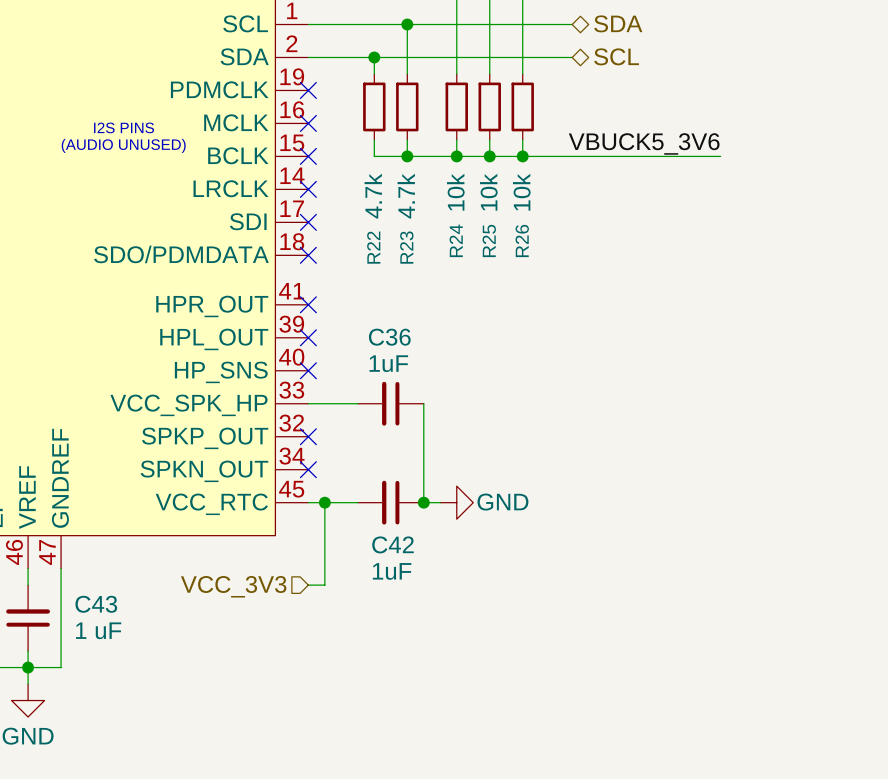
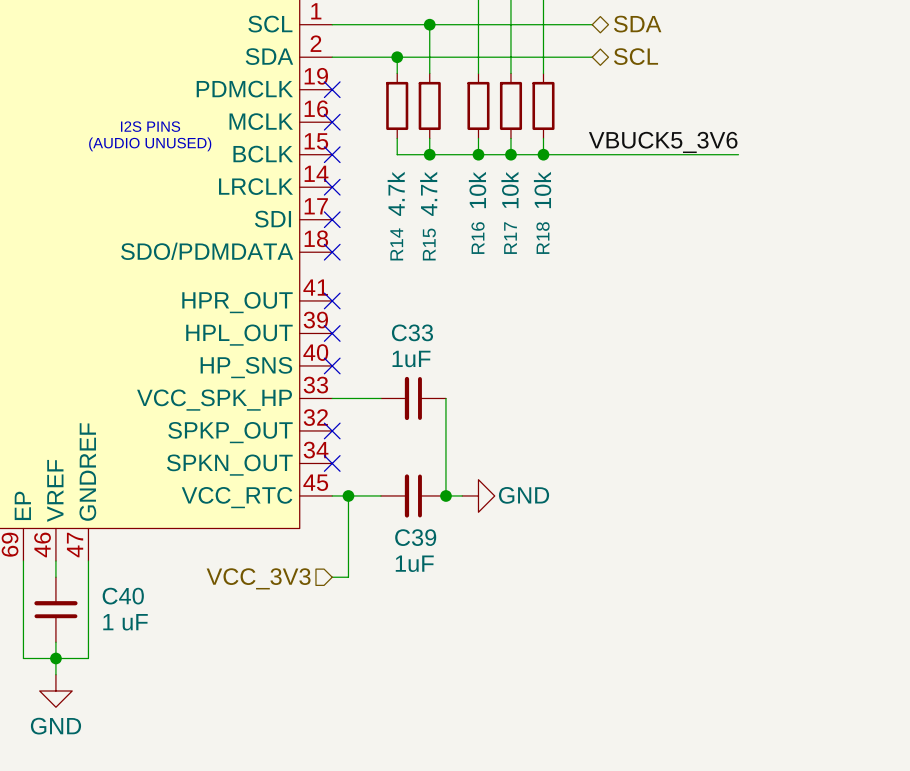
R24 name: R24 (456, 240) -> R16 (478, 238)
R25 name: R25 (489, 240) -> R17 (510, 238)
R26 name: R26 (522, 240) -> R18 (543, 238)
R22 name: R22 (373, 247) -> R14 (396, 244)
R23 name: R23 (406, 247) -> R15 (429, 244)
C36 name: C36 (389, 337) -> C33 (412, 332)
C42 name: C42 (393, 544) -> C39 (415, 537)
C43 name: C43 (96, 604) -> C40 (123, 596)

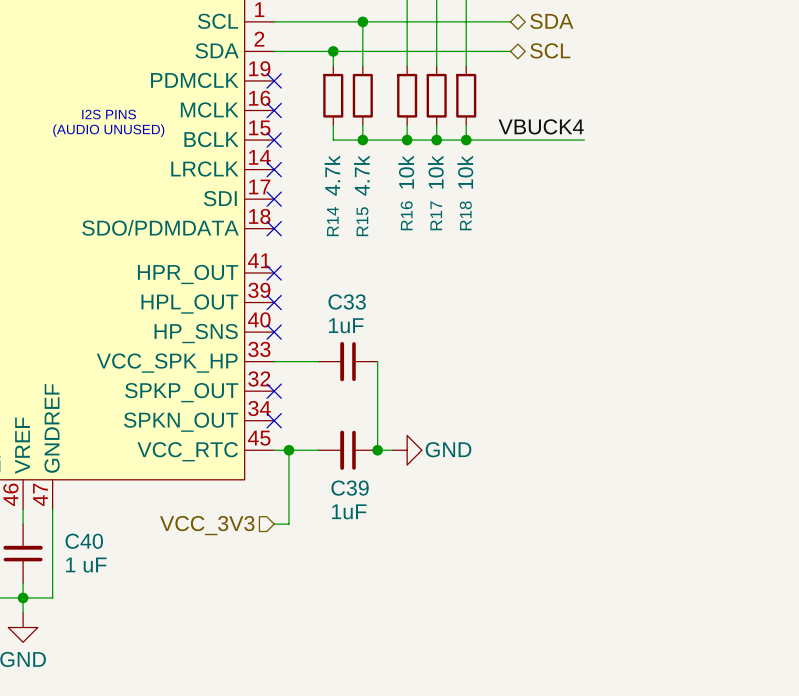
label: VBUCK5_3V6 (663, 142) -> VBUCK4 (541, 126)
wire: (673, 154) (738, 154) -> none

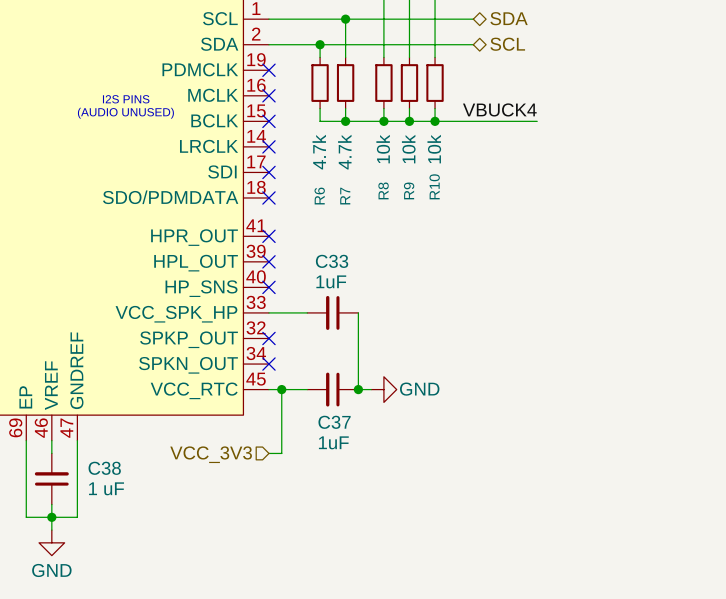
R16 name: R16 (406, 215) -> R8 (383, 190)
R17 name: R17 (436, 215) -> R9 (409, 190)
R18 name: R18 (465, 215) -> R10 (434, 186)
R14 name: R14 (332, 221) -> R6 (319, 196)
R15 name: R15 (362, 221) -> R7 (345, 196)
C39 name: C39 (350, 488) -> C37 (334, 422)
C40 name: C40 (84, 541) -> C38 (104, 468)

